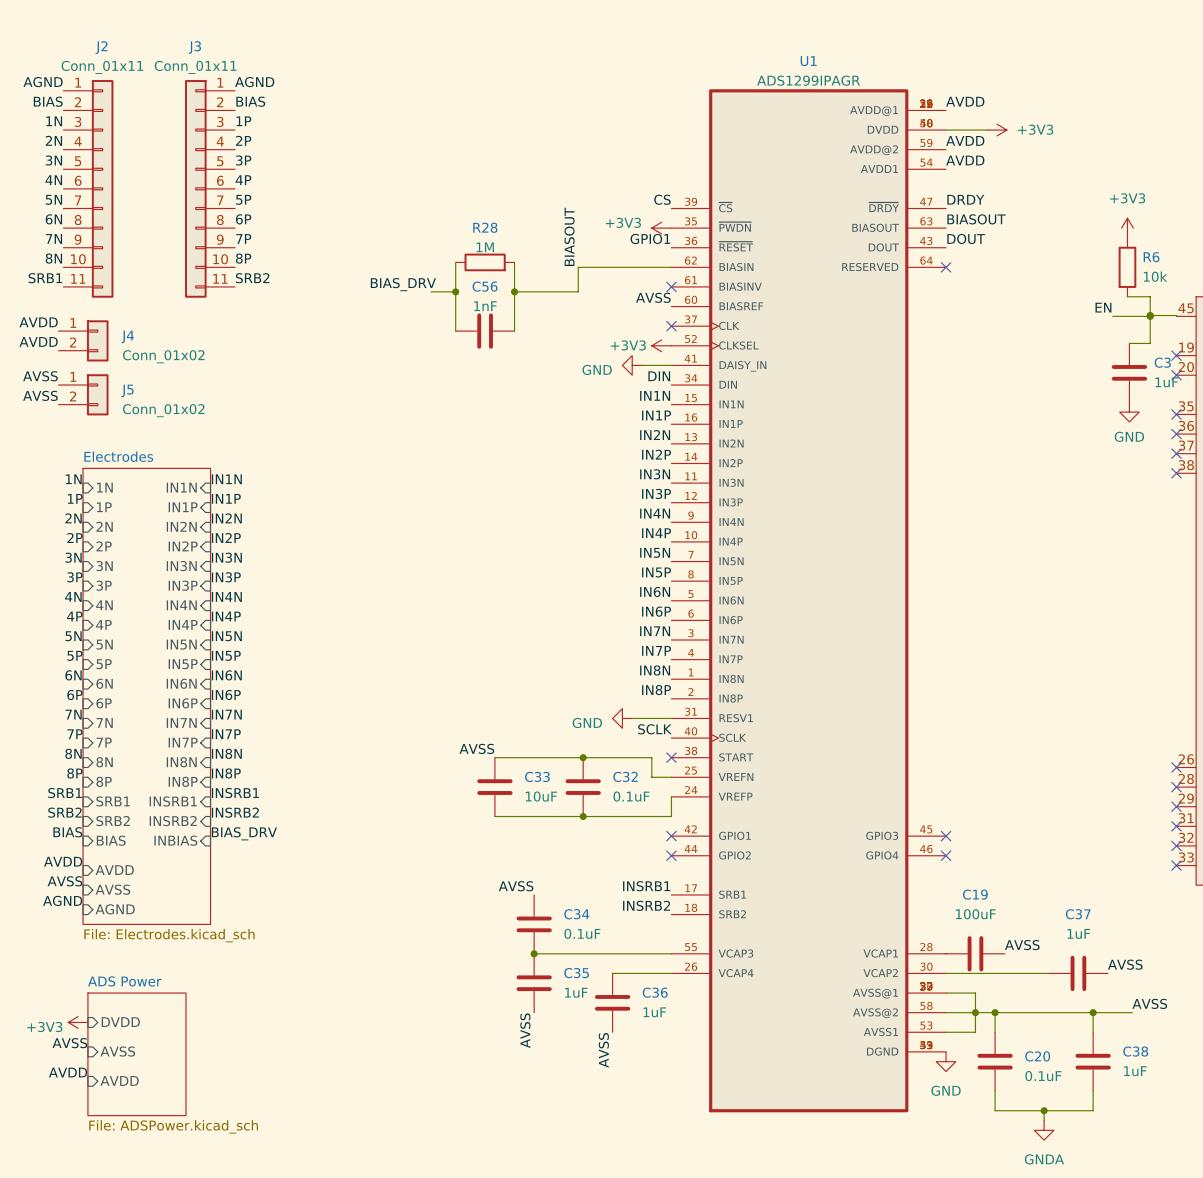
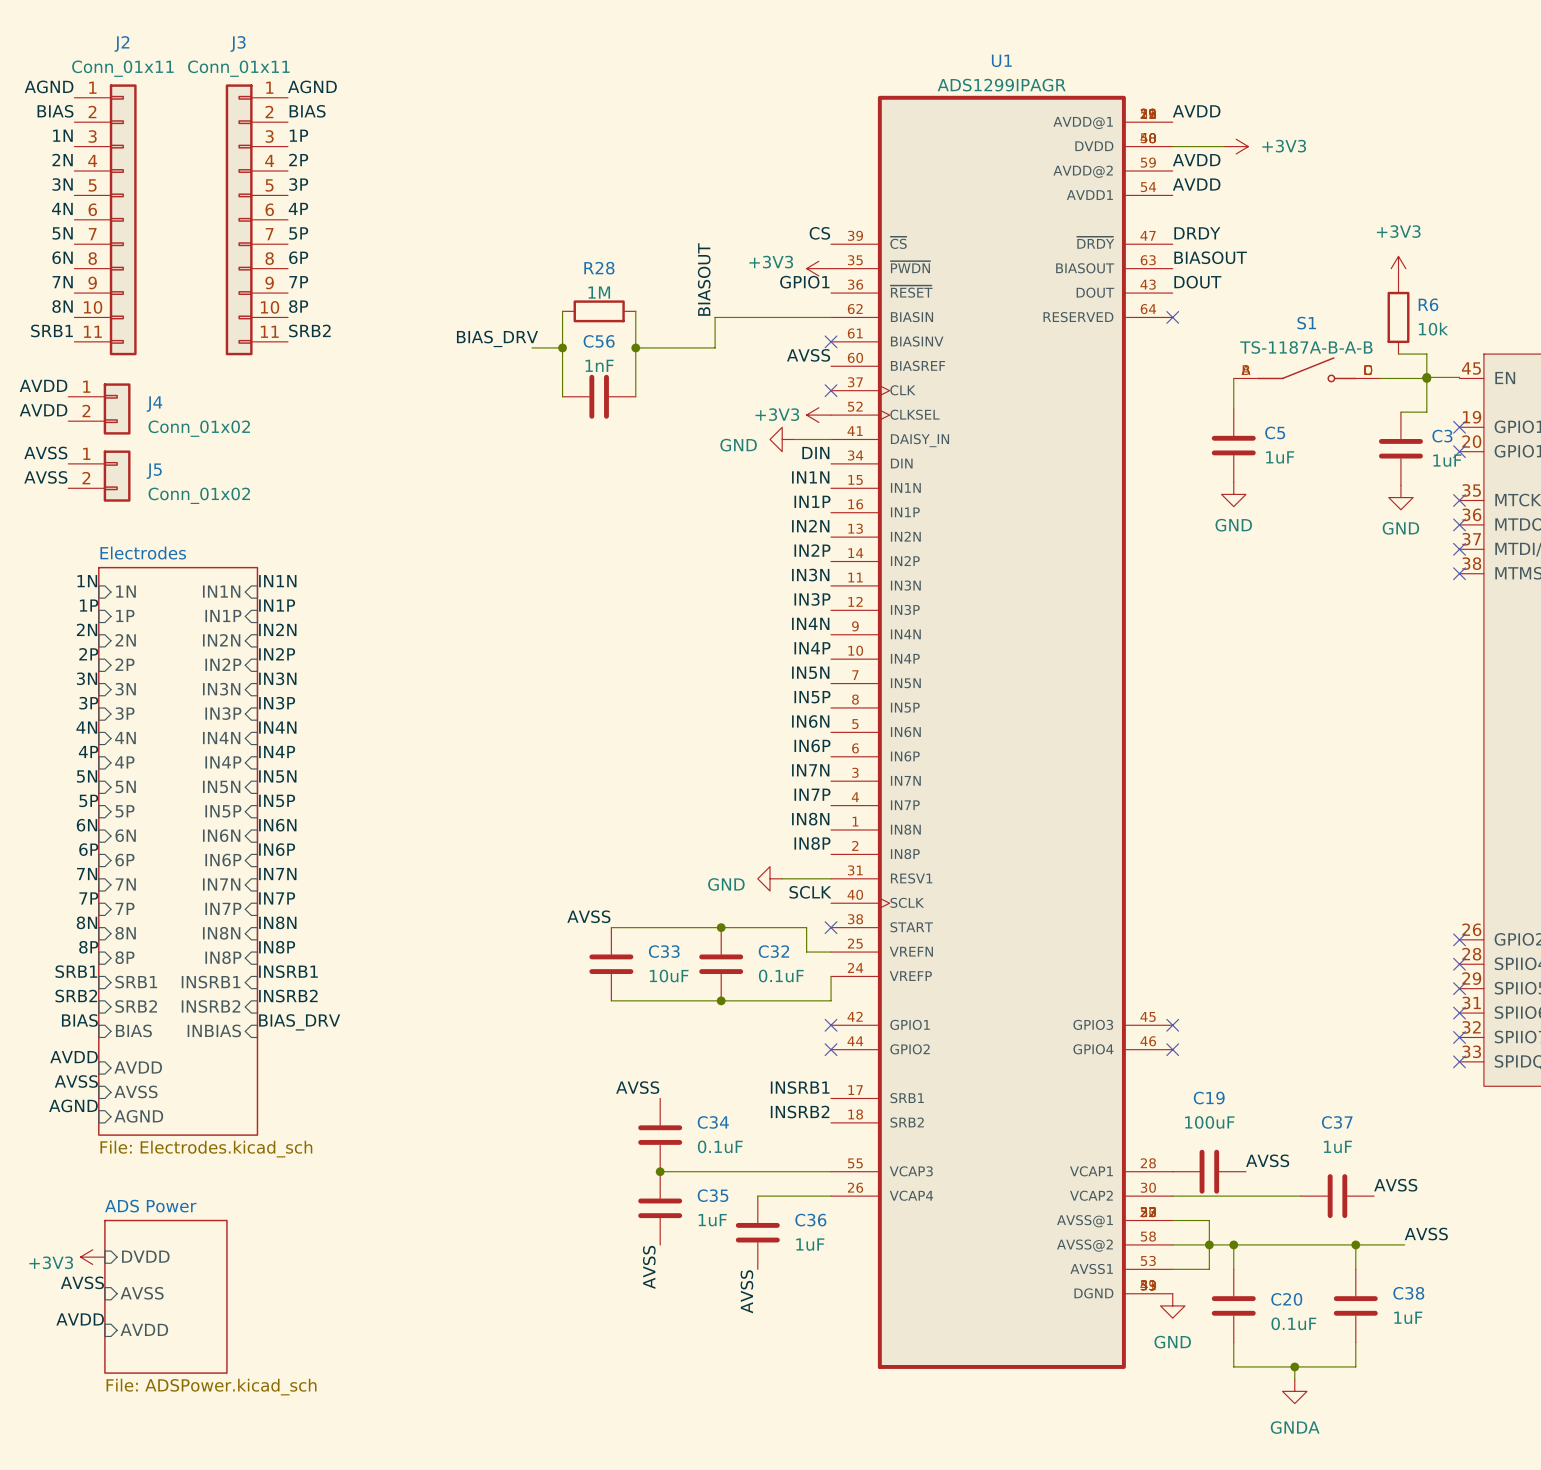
label: EN (1103, 307) -> none
S1: none -> TS-1187A-B-A-B (1306, 369)
wire: none -> (1233, 378) (1233, 408)
C5: none -> 1uF (1233, 445)
power symbol: none -> GND (1233, 494)

